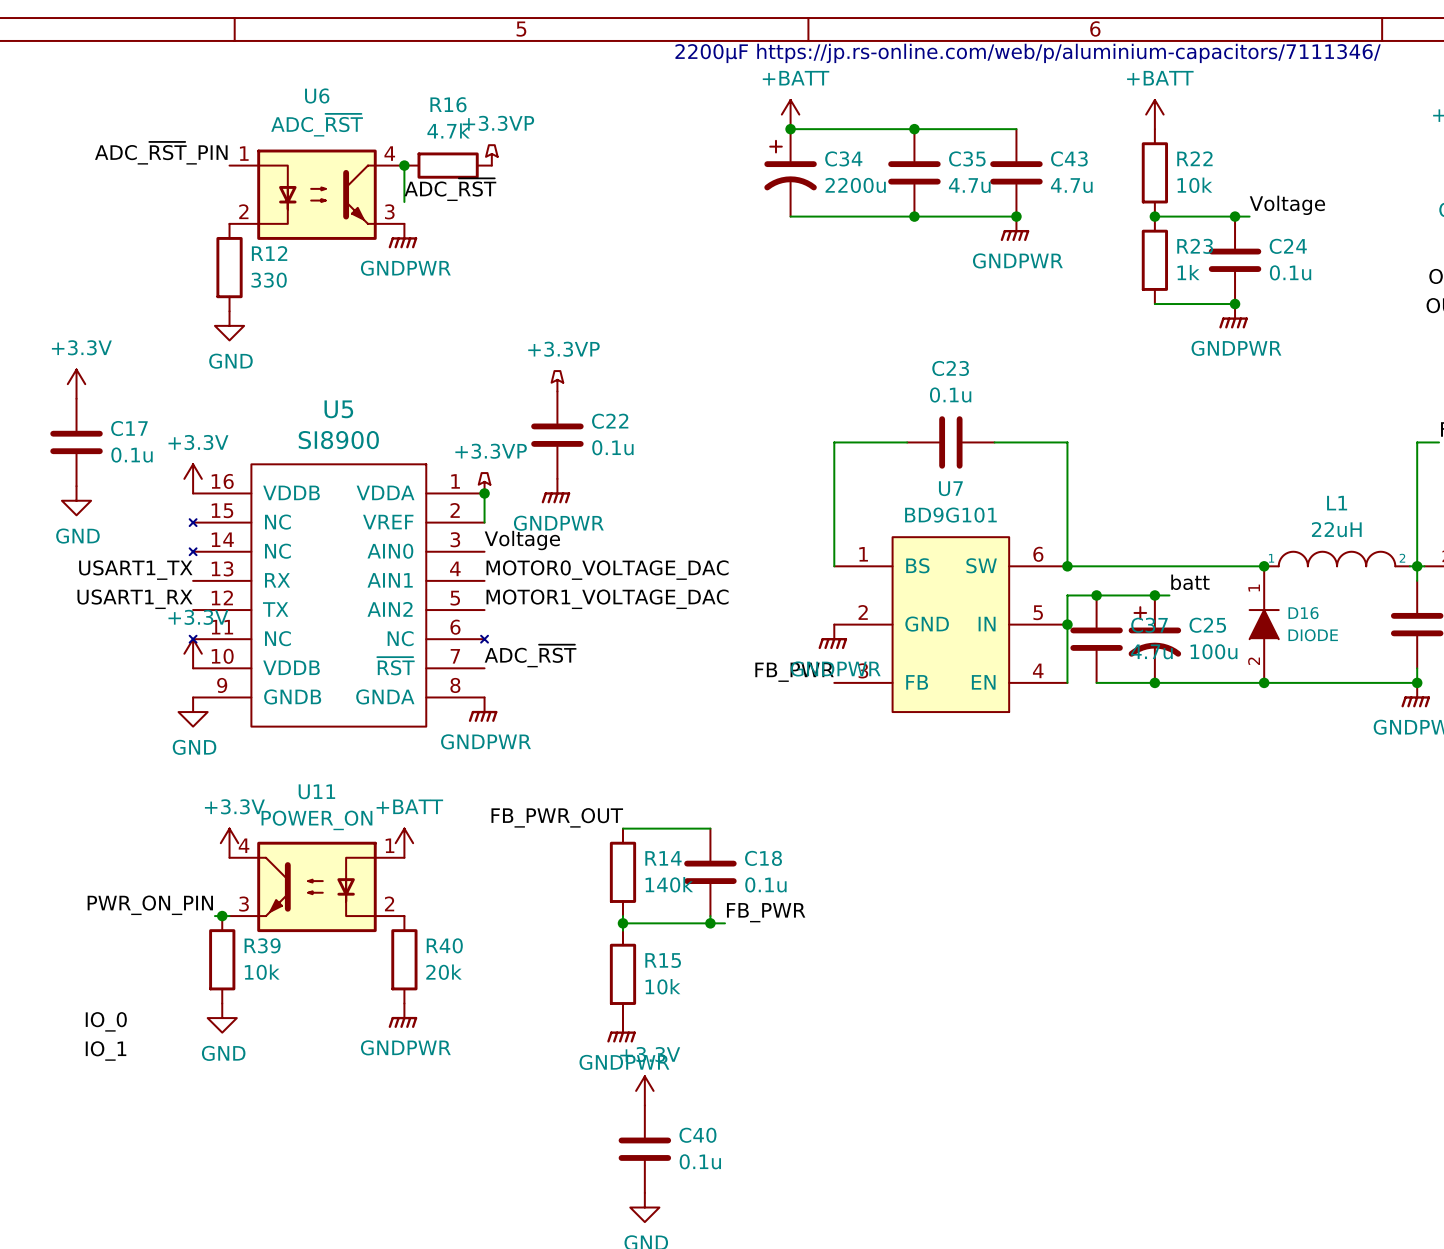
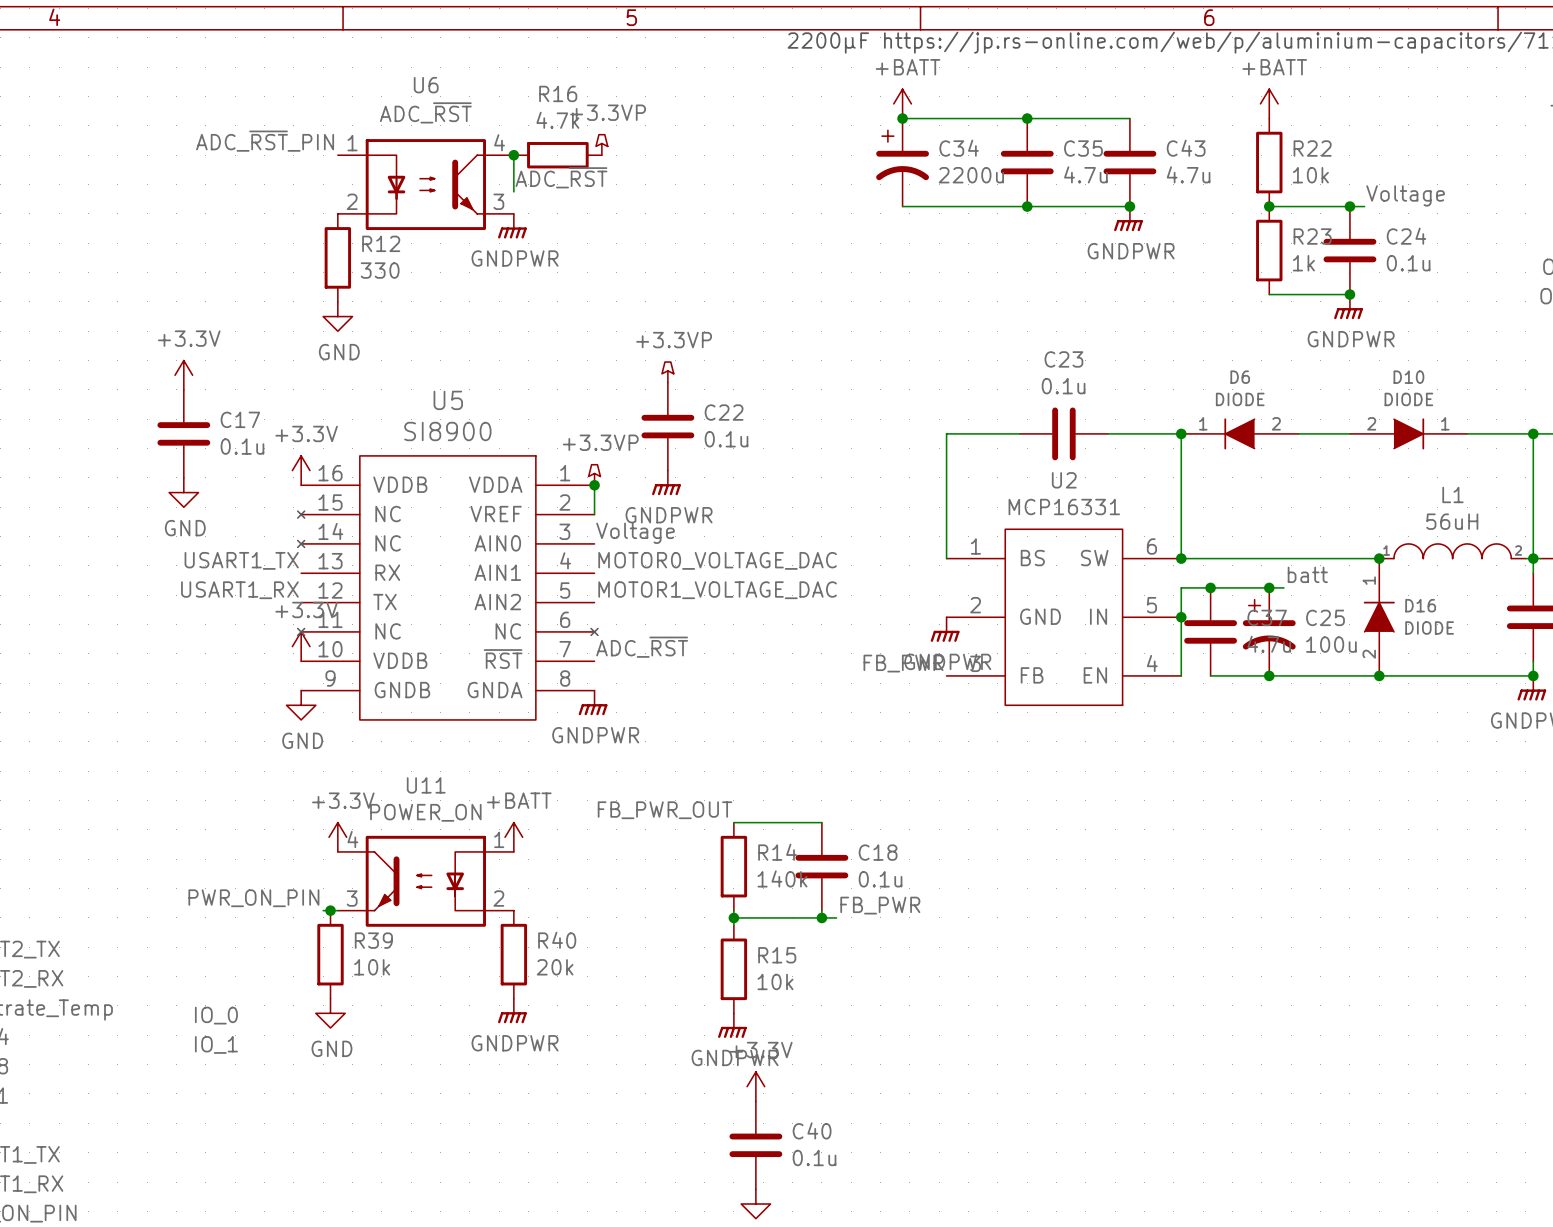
junction: none -> (1181, 433)
D6: none -> DIODE (1239, 433)
wire: none -> (1298, 433) (1349, 433)
D10: none -> DIODE (1408, 433)
wire: none -> (1467, 433) (1533, 433)
junction: none -> (1533, 433)
L1 value: 22uH (1336, 529) -> 56uH (1452, 521)
U7: BD9G101 (950, 624) -> none
U2: none -> MCP16331 (1063, 617)

